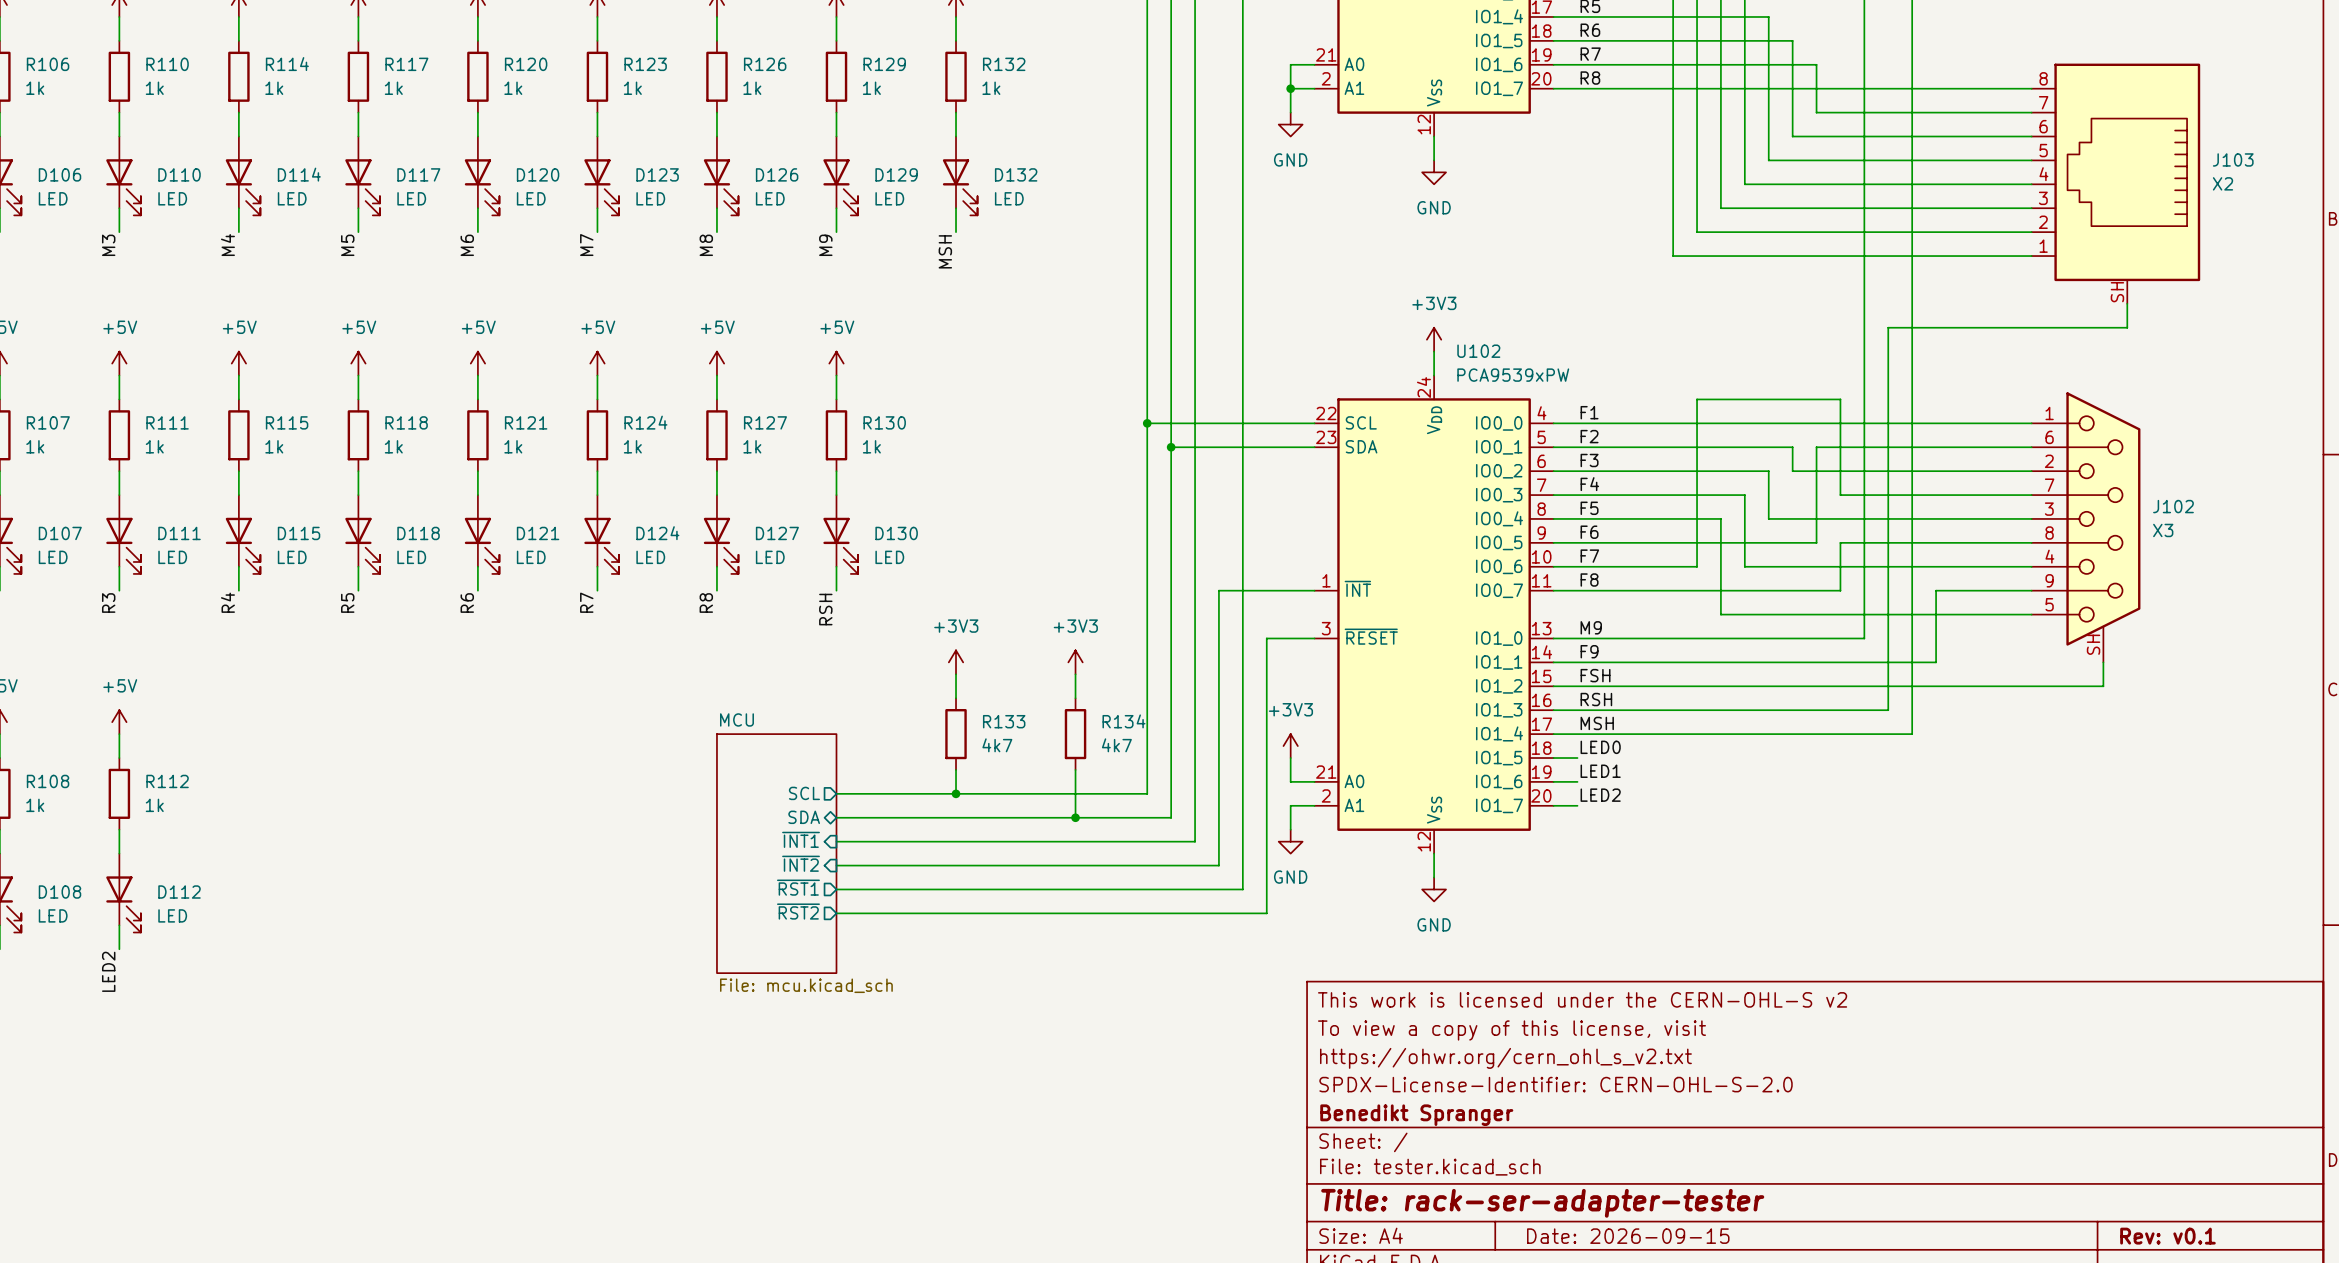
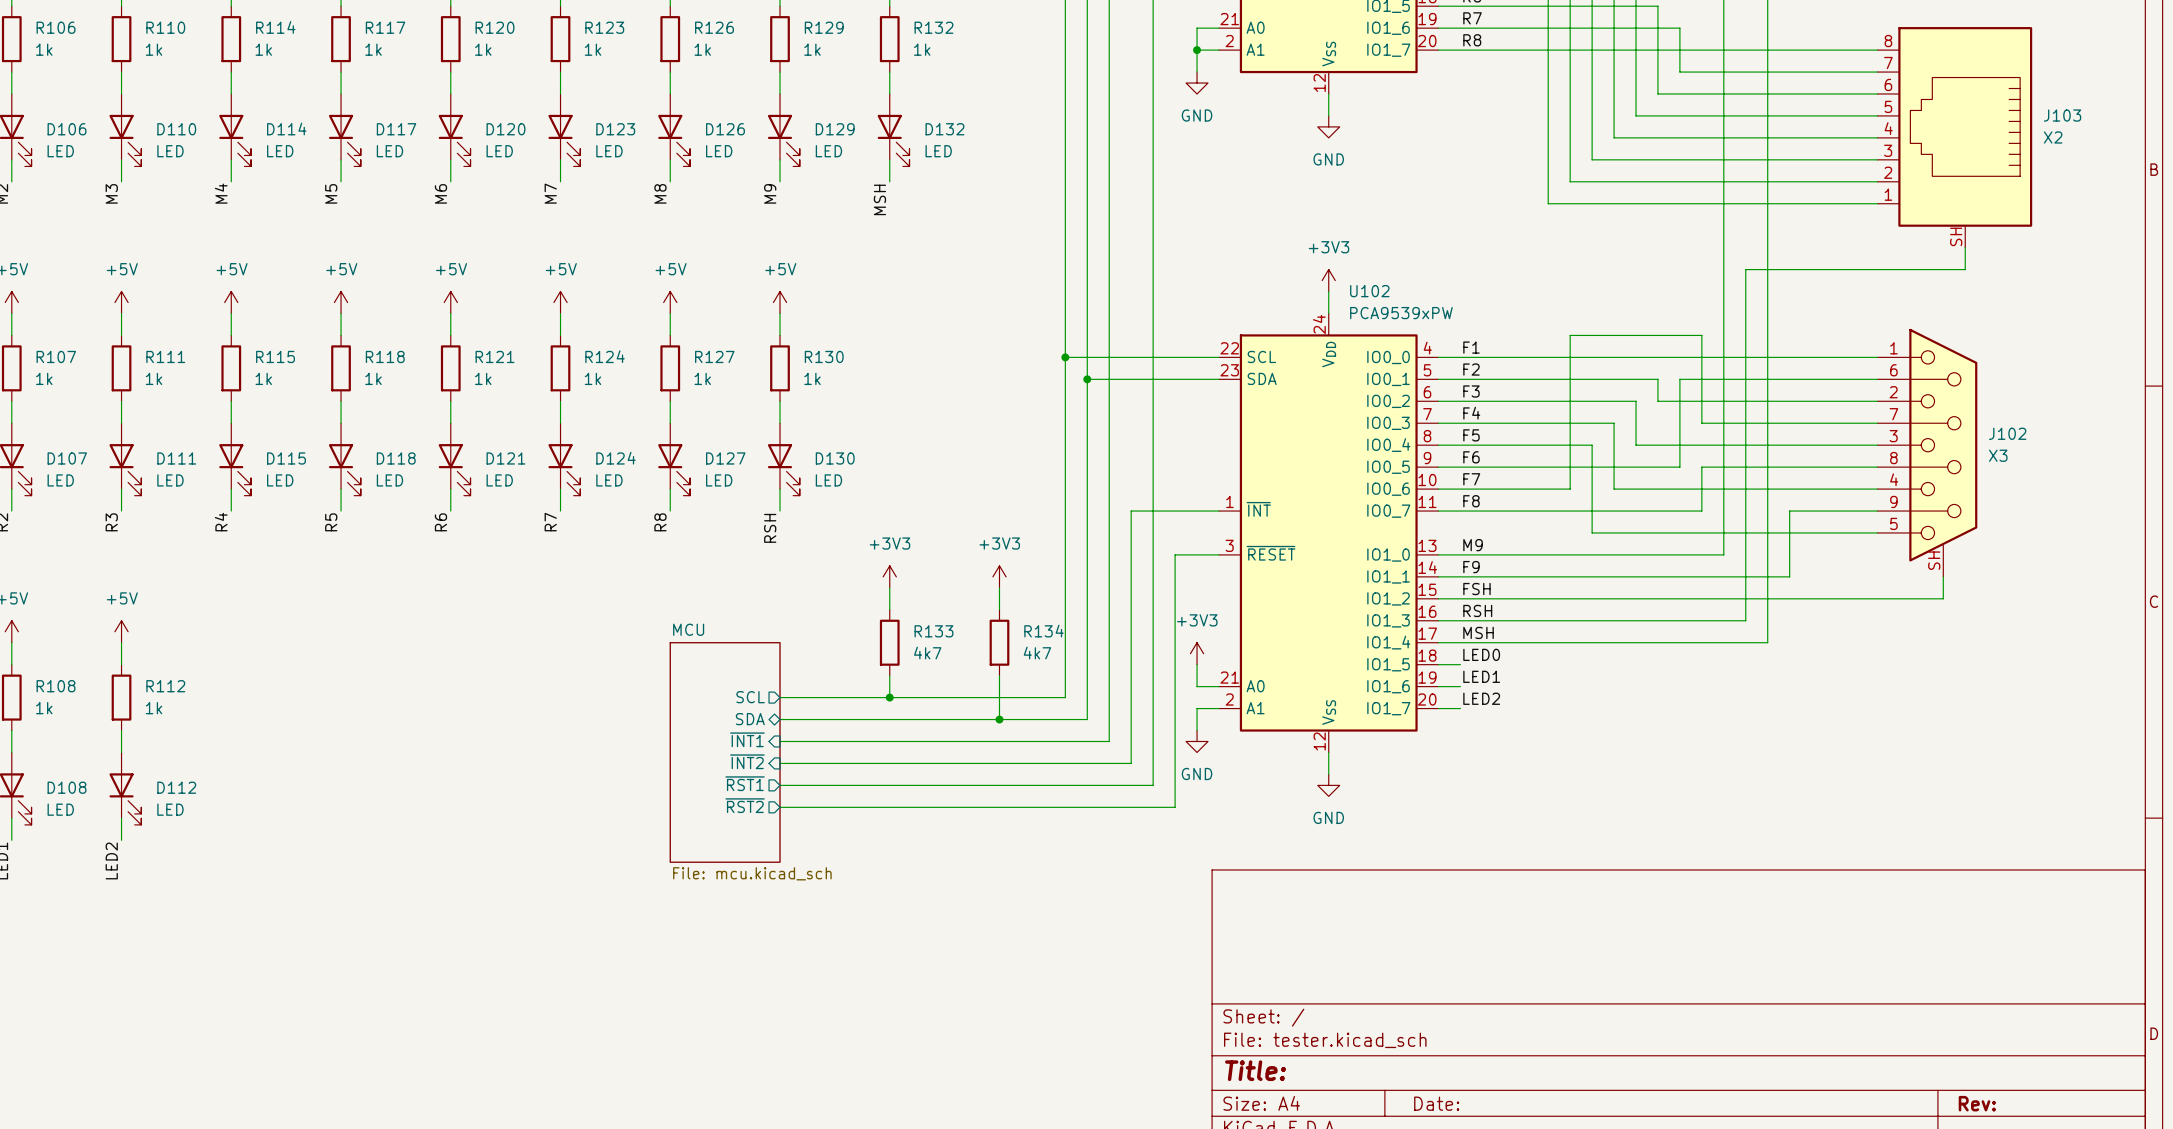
title block: This work is licensed under the CERN-OHL-S v2 (1582, 999) -> none
title block: To view a copy of this license, visit (1511, 1030) -> none
title block: https://ohwr.org/cern_ohl_s_v2.txt (1505, 1058) -> none
title block: SPDX-License-Identifier: CERN-OHL-S-2.0 (1556, 1084) -> none
title block: Benedikt Spranger (1416, 1115) -> none
title block: Title: rack-ser-adapter-tester (1542, 1203) -> Title: (1255, 1070)
title block: Date: 2026-09-15 (1628, 1236) -> Date: (1436, 1103)
title block: Rev: v0.1 (2167, 1236) -> Rev: (1977, 1103)

